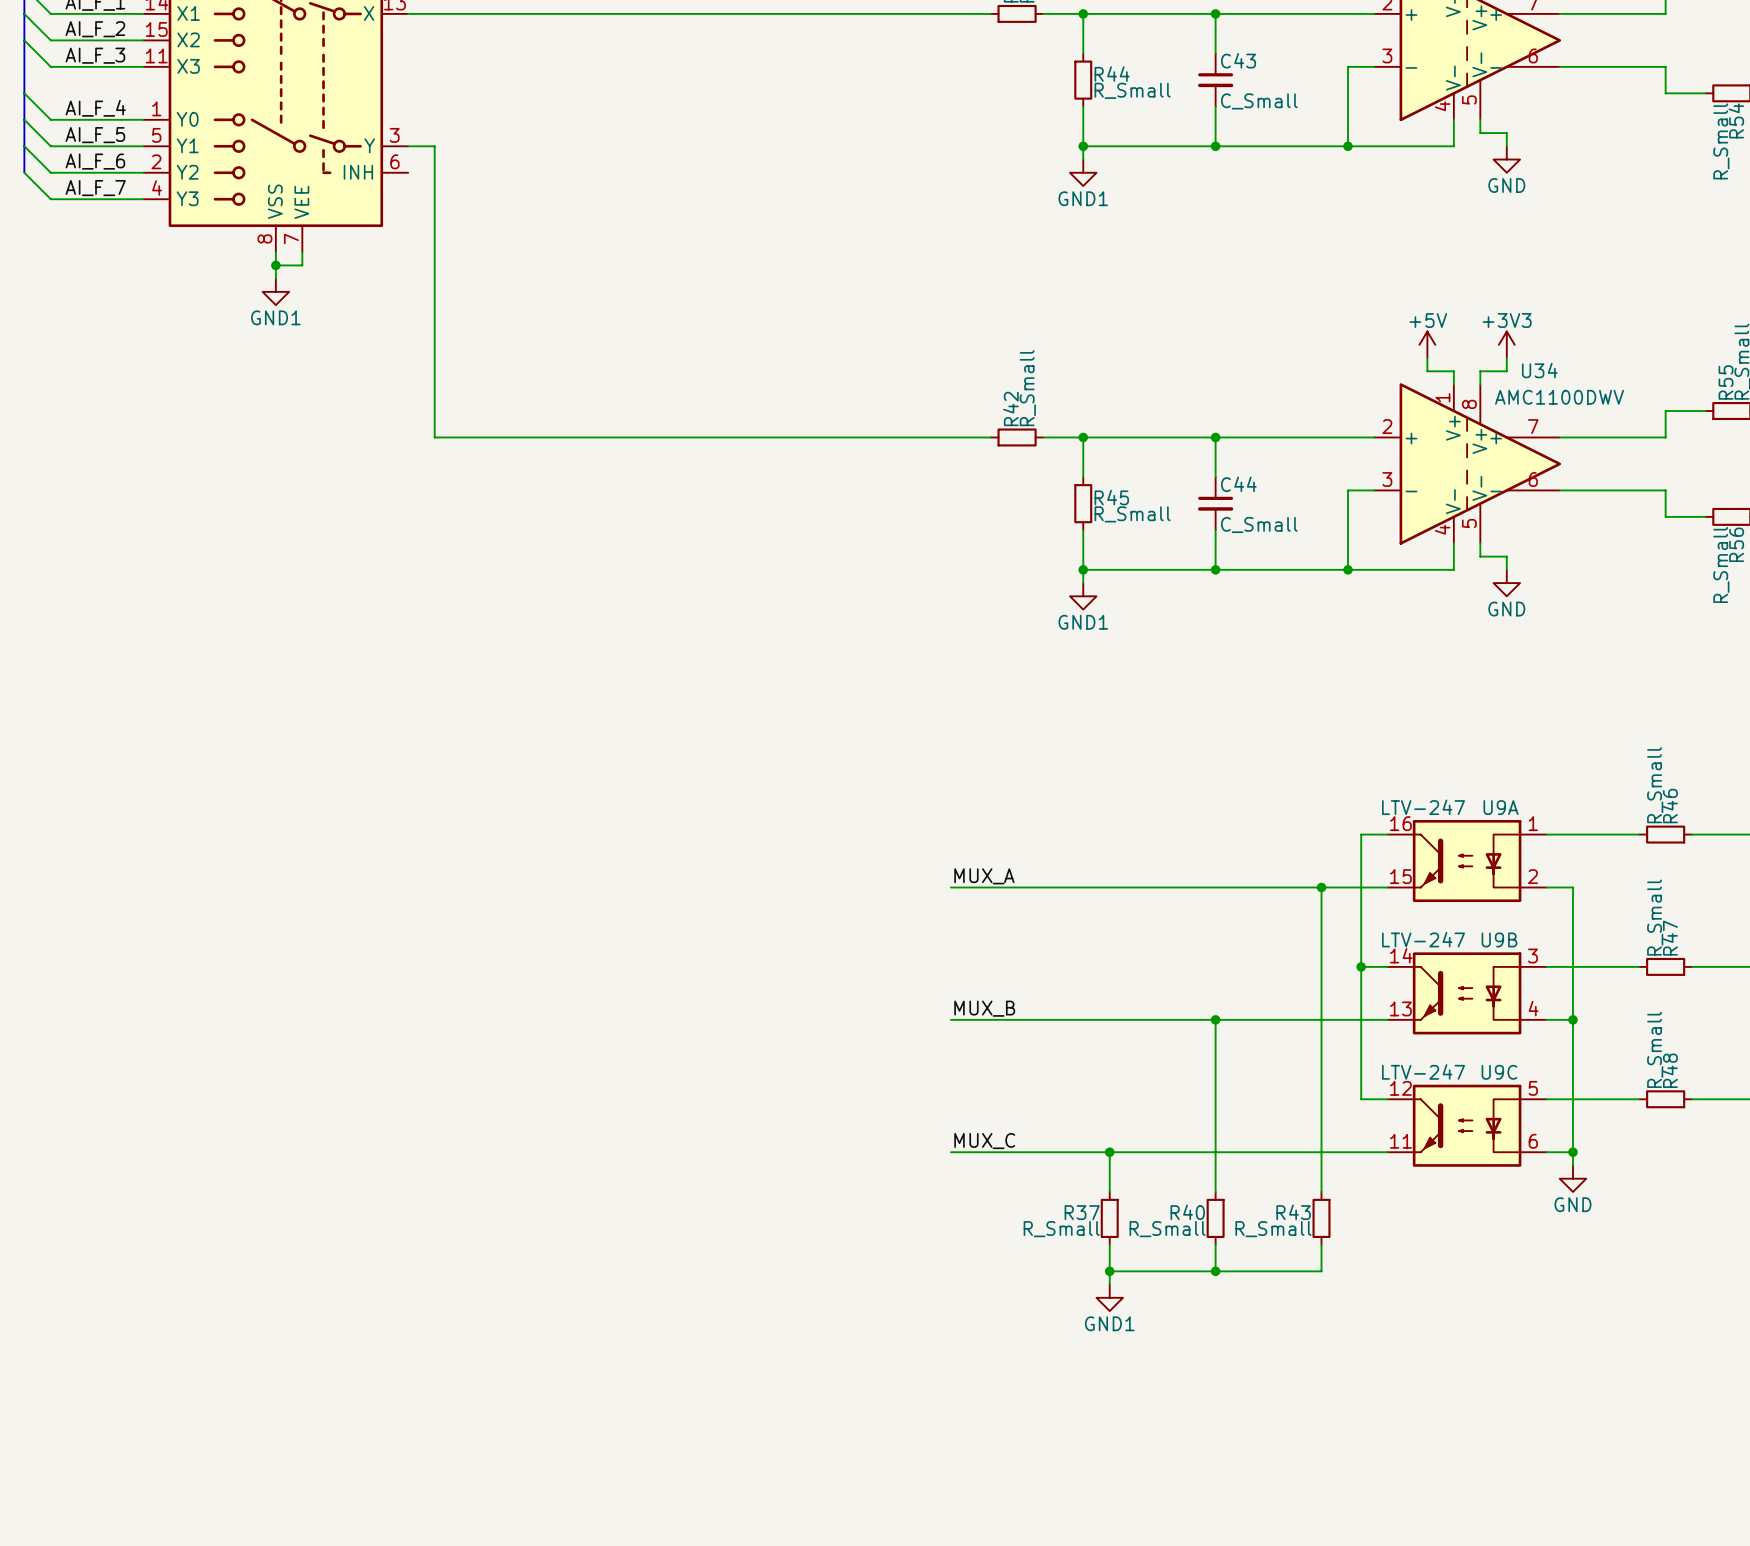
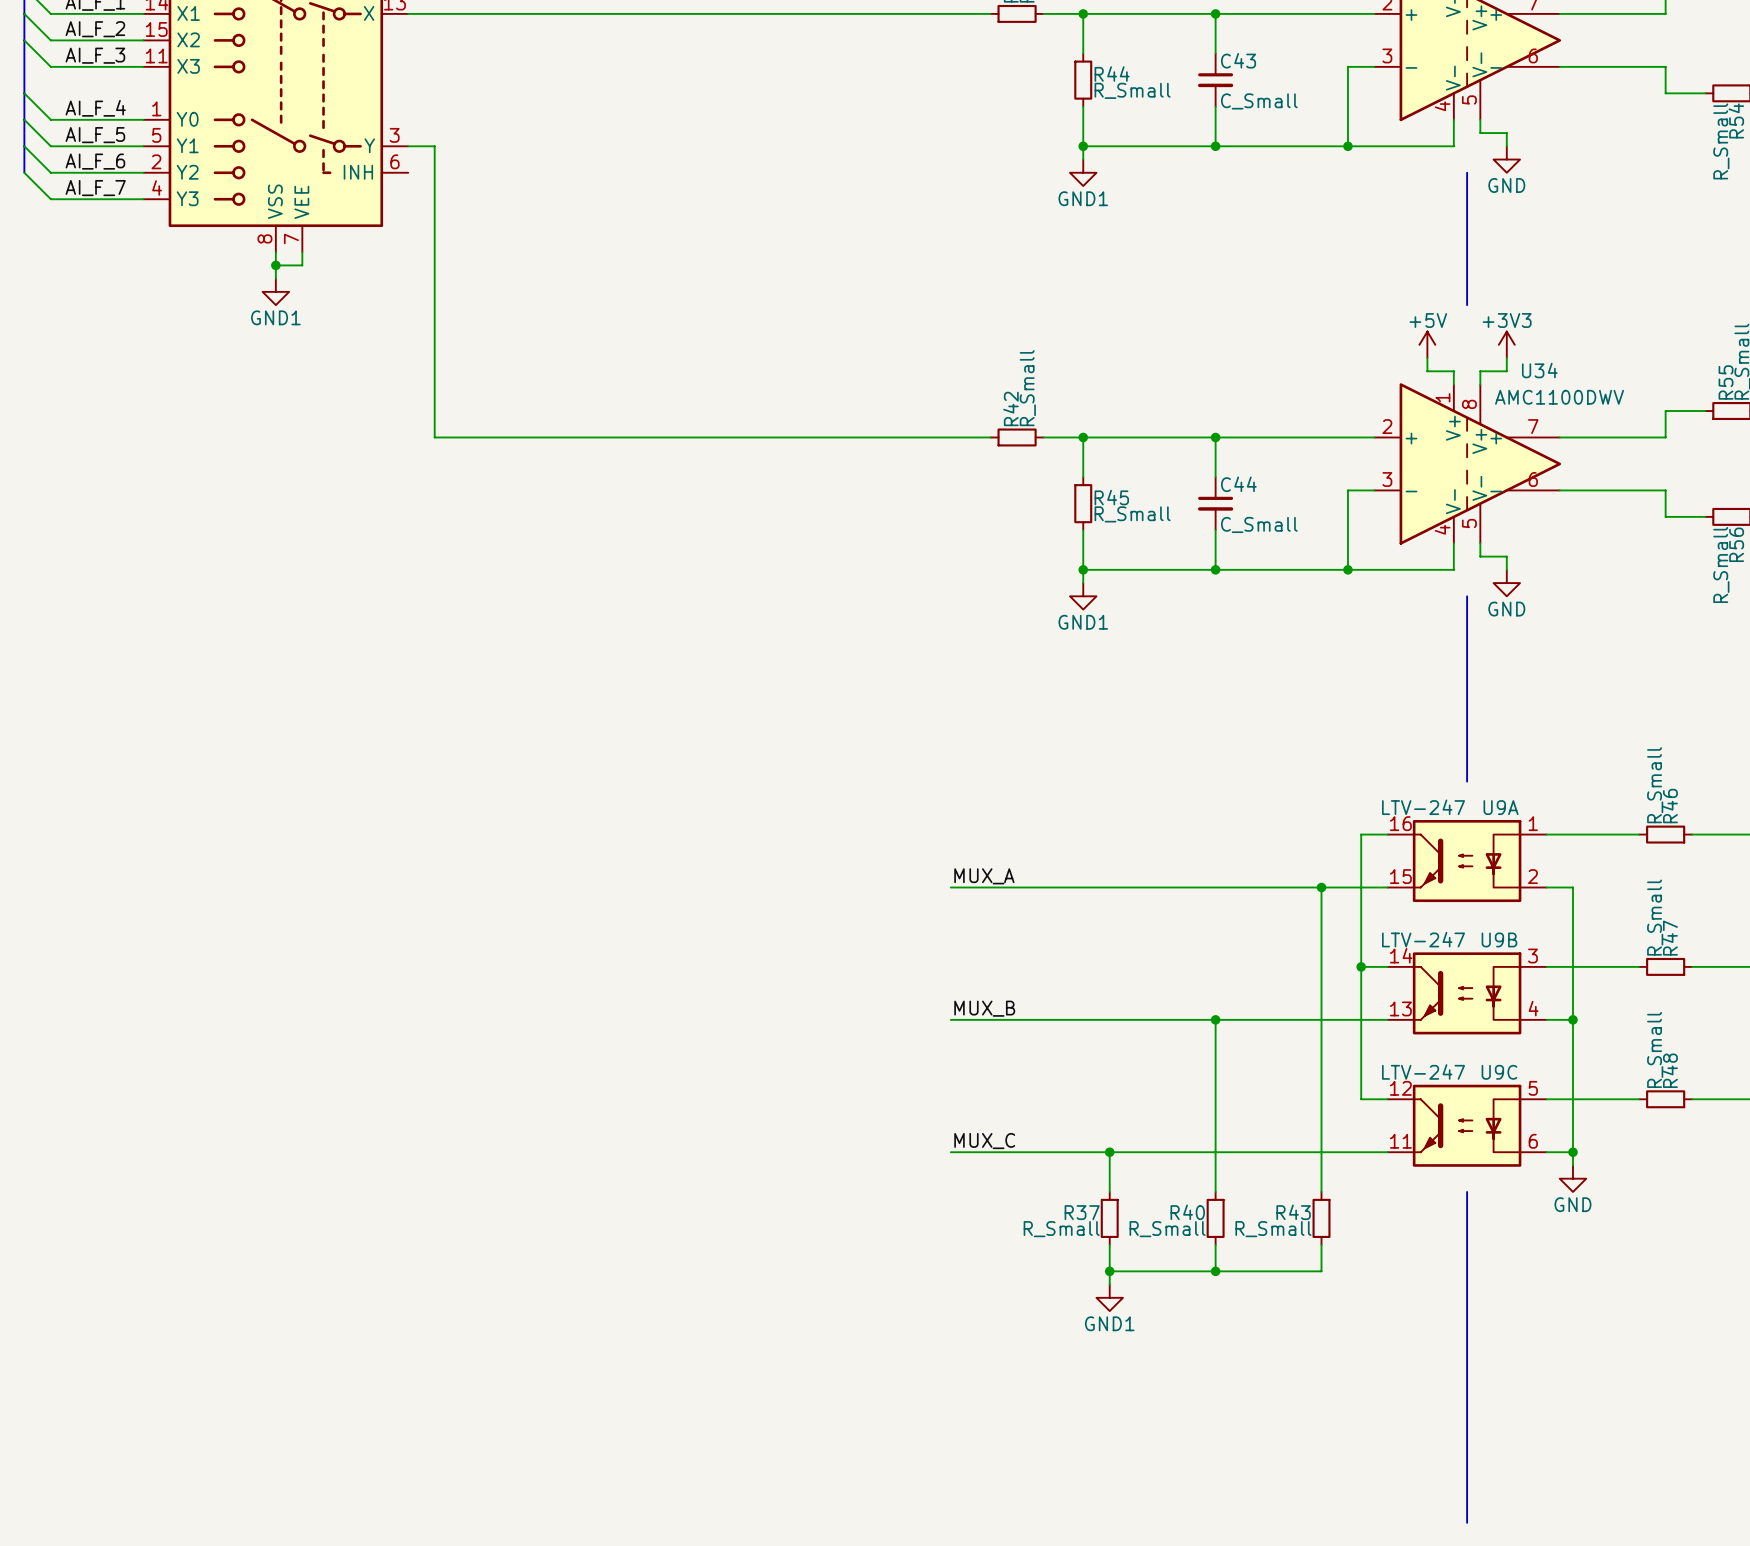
line: none -> (1467, 172) (1467, 305)
line: none -> (1467, 596) (1467, 781)
line: none -> (1467, 1191) (1467, 1522)

